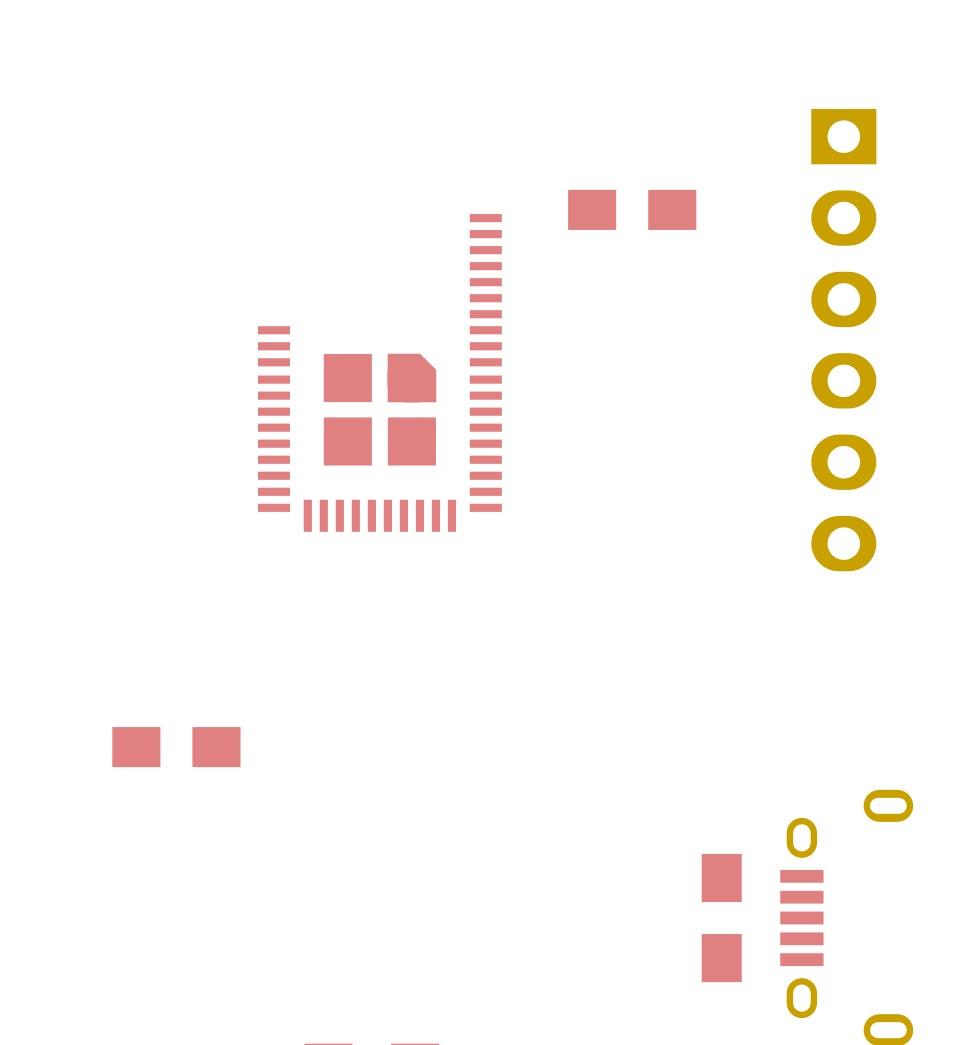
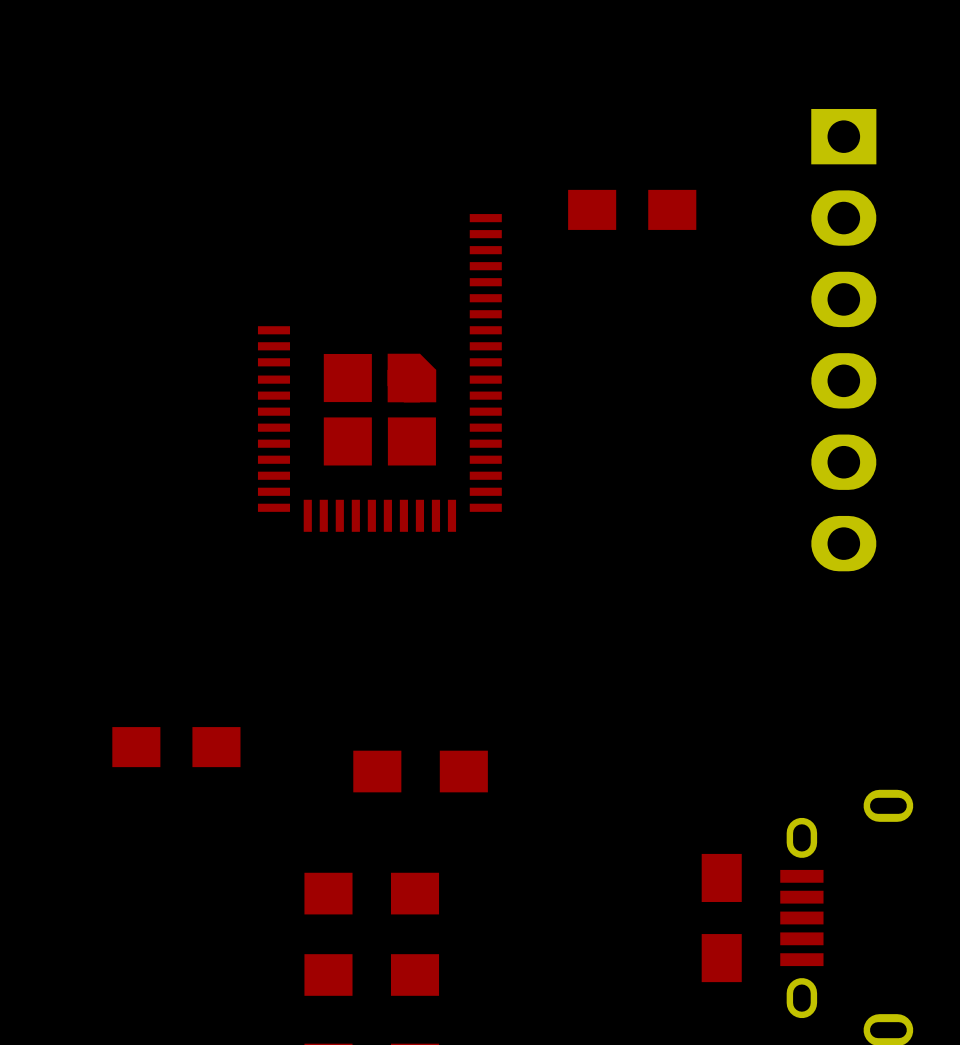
part: none -> (420, 771)
part: none -> (371, 893)
part: none -> (371, 974)

